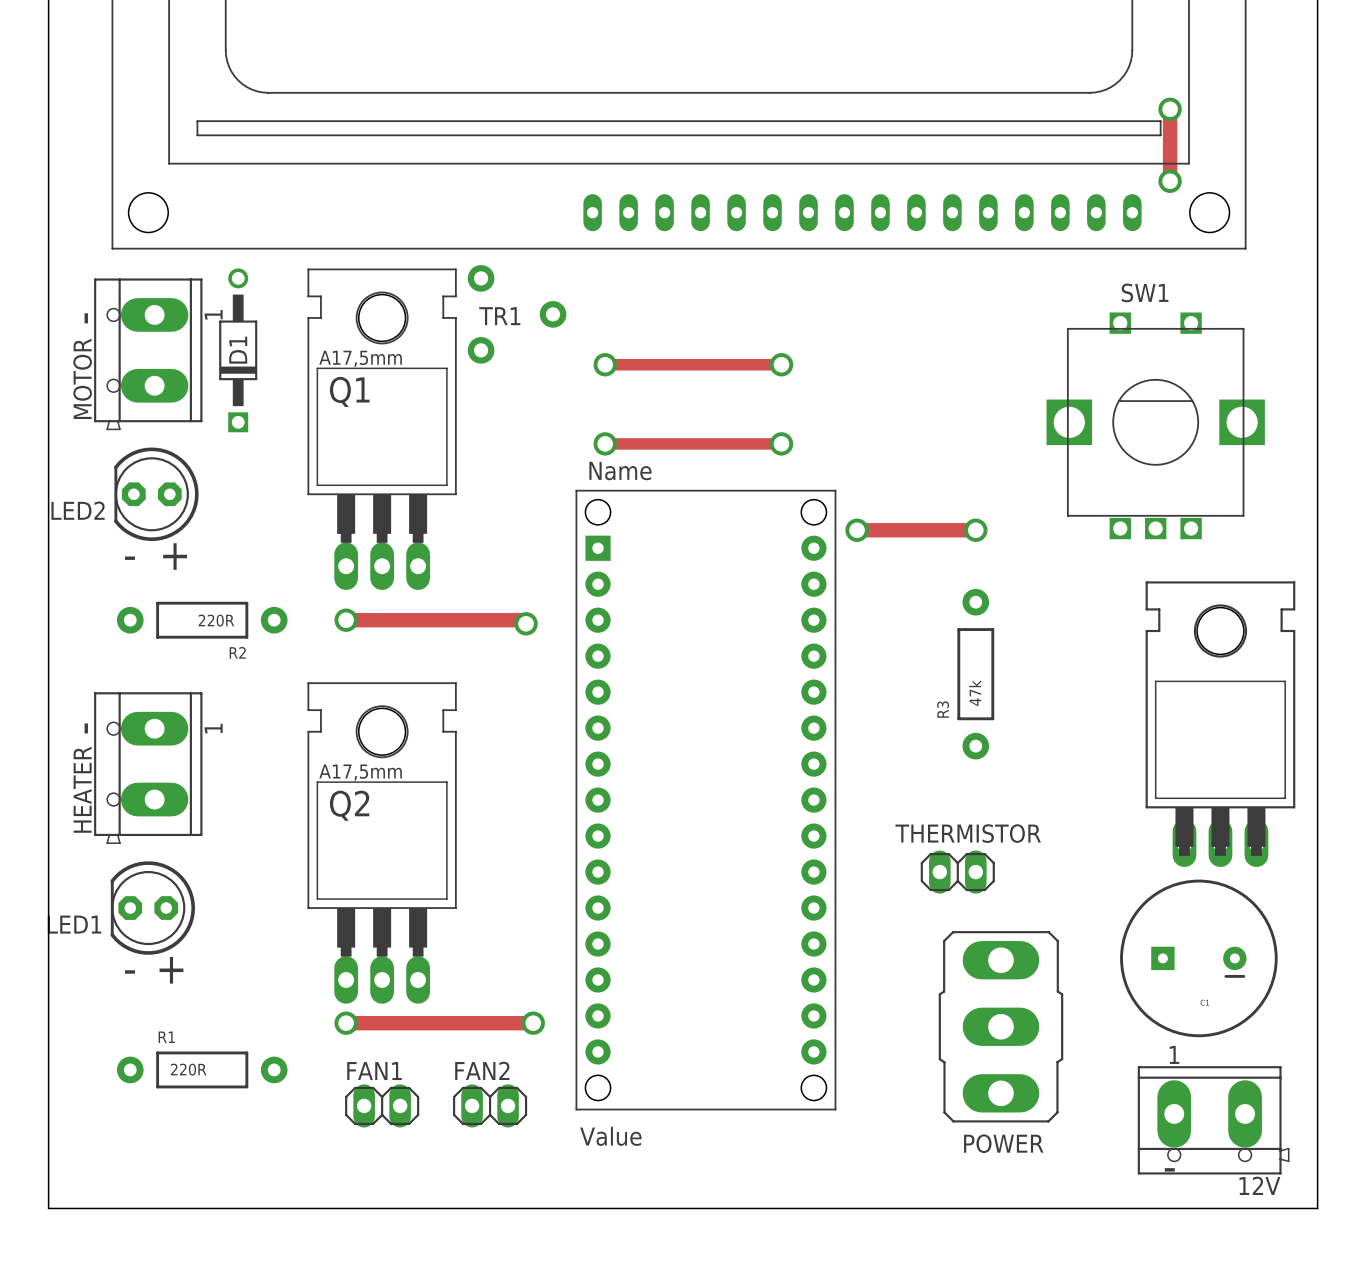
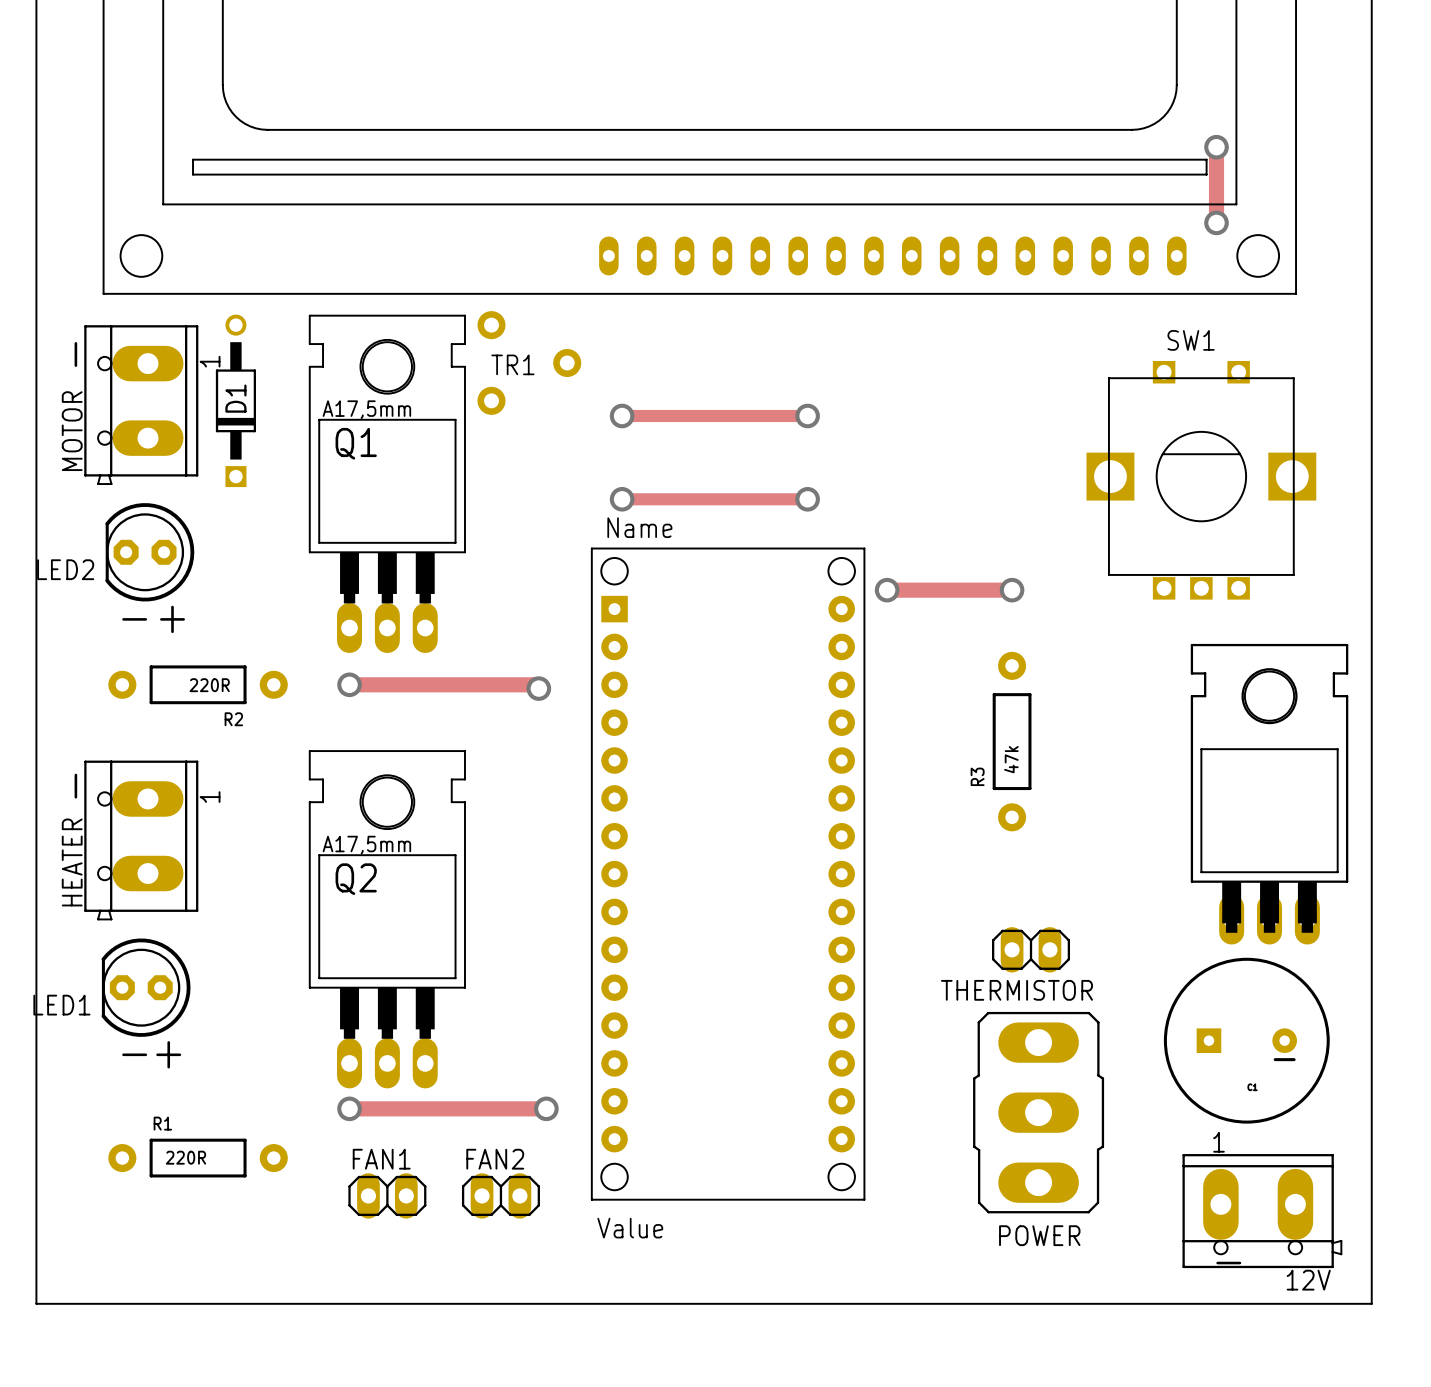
THERMISTOR name position: THERMISTOR (968, 833) -> THERMISTOR (1016, 990)
THERMISTOR position: (957, 872) -> (1031, 949)

